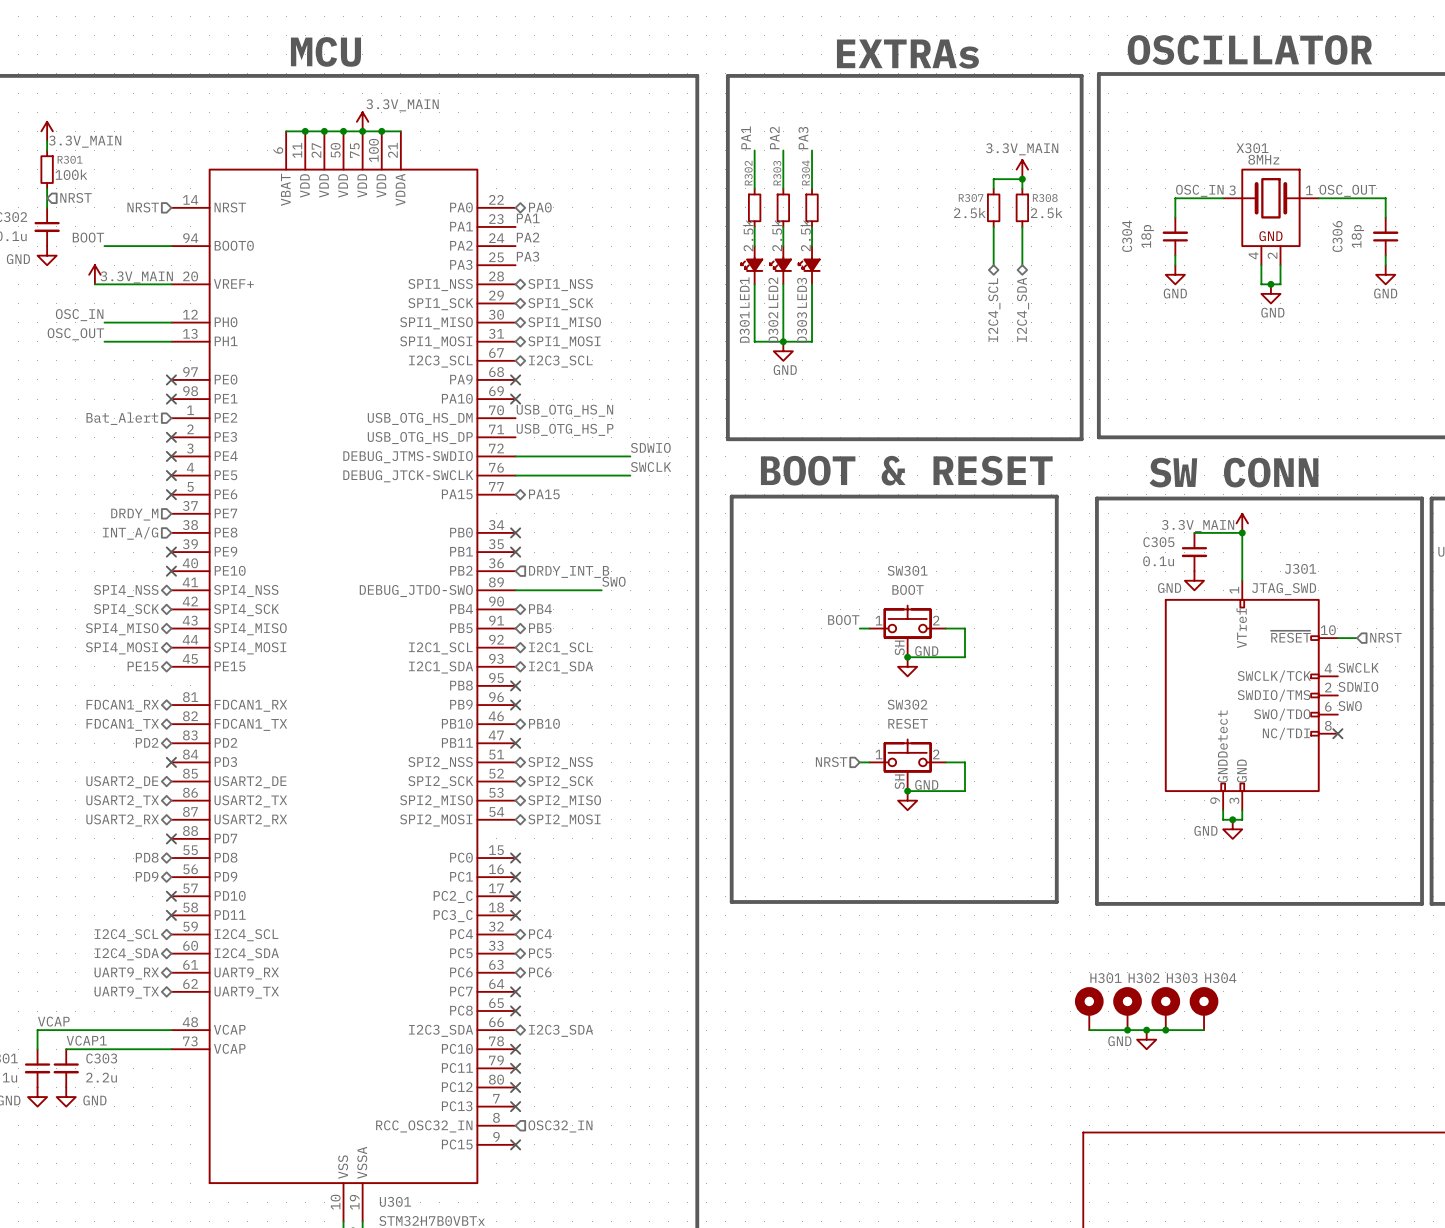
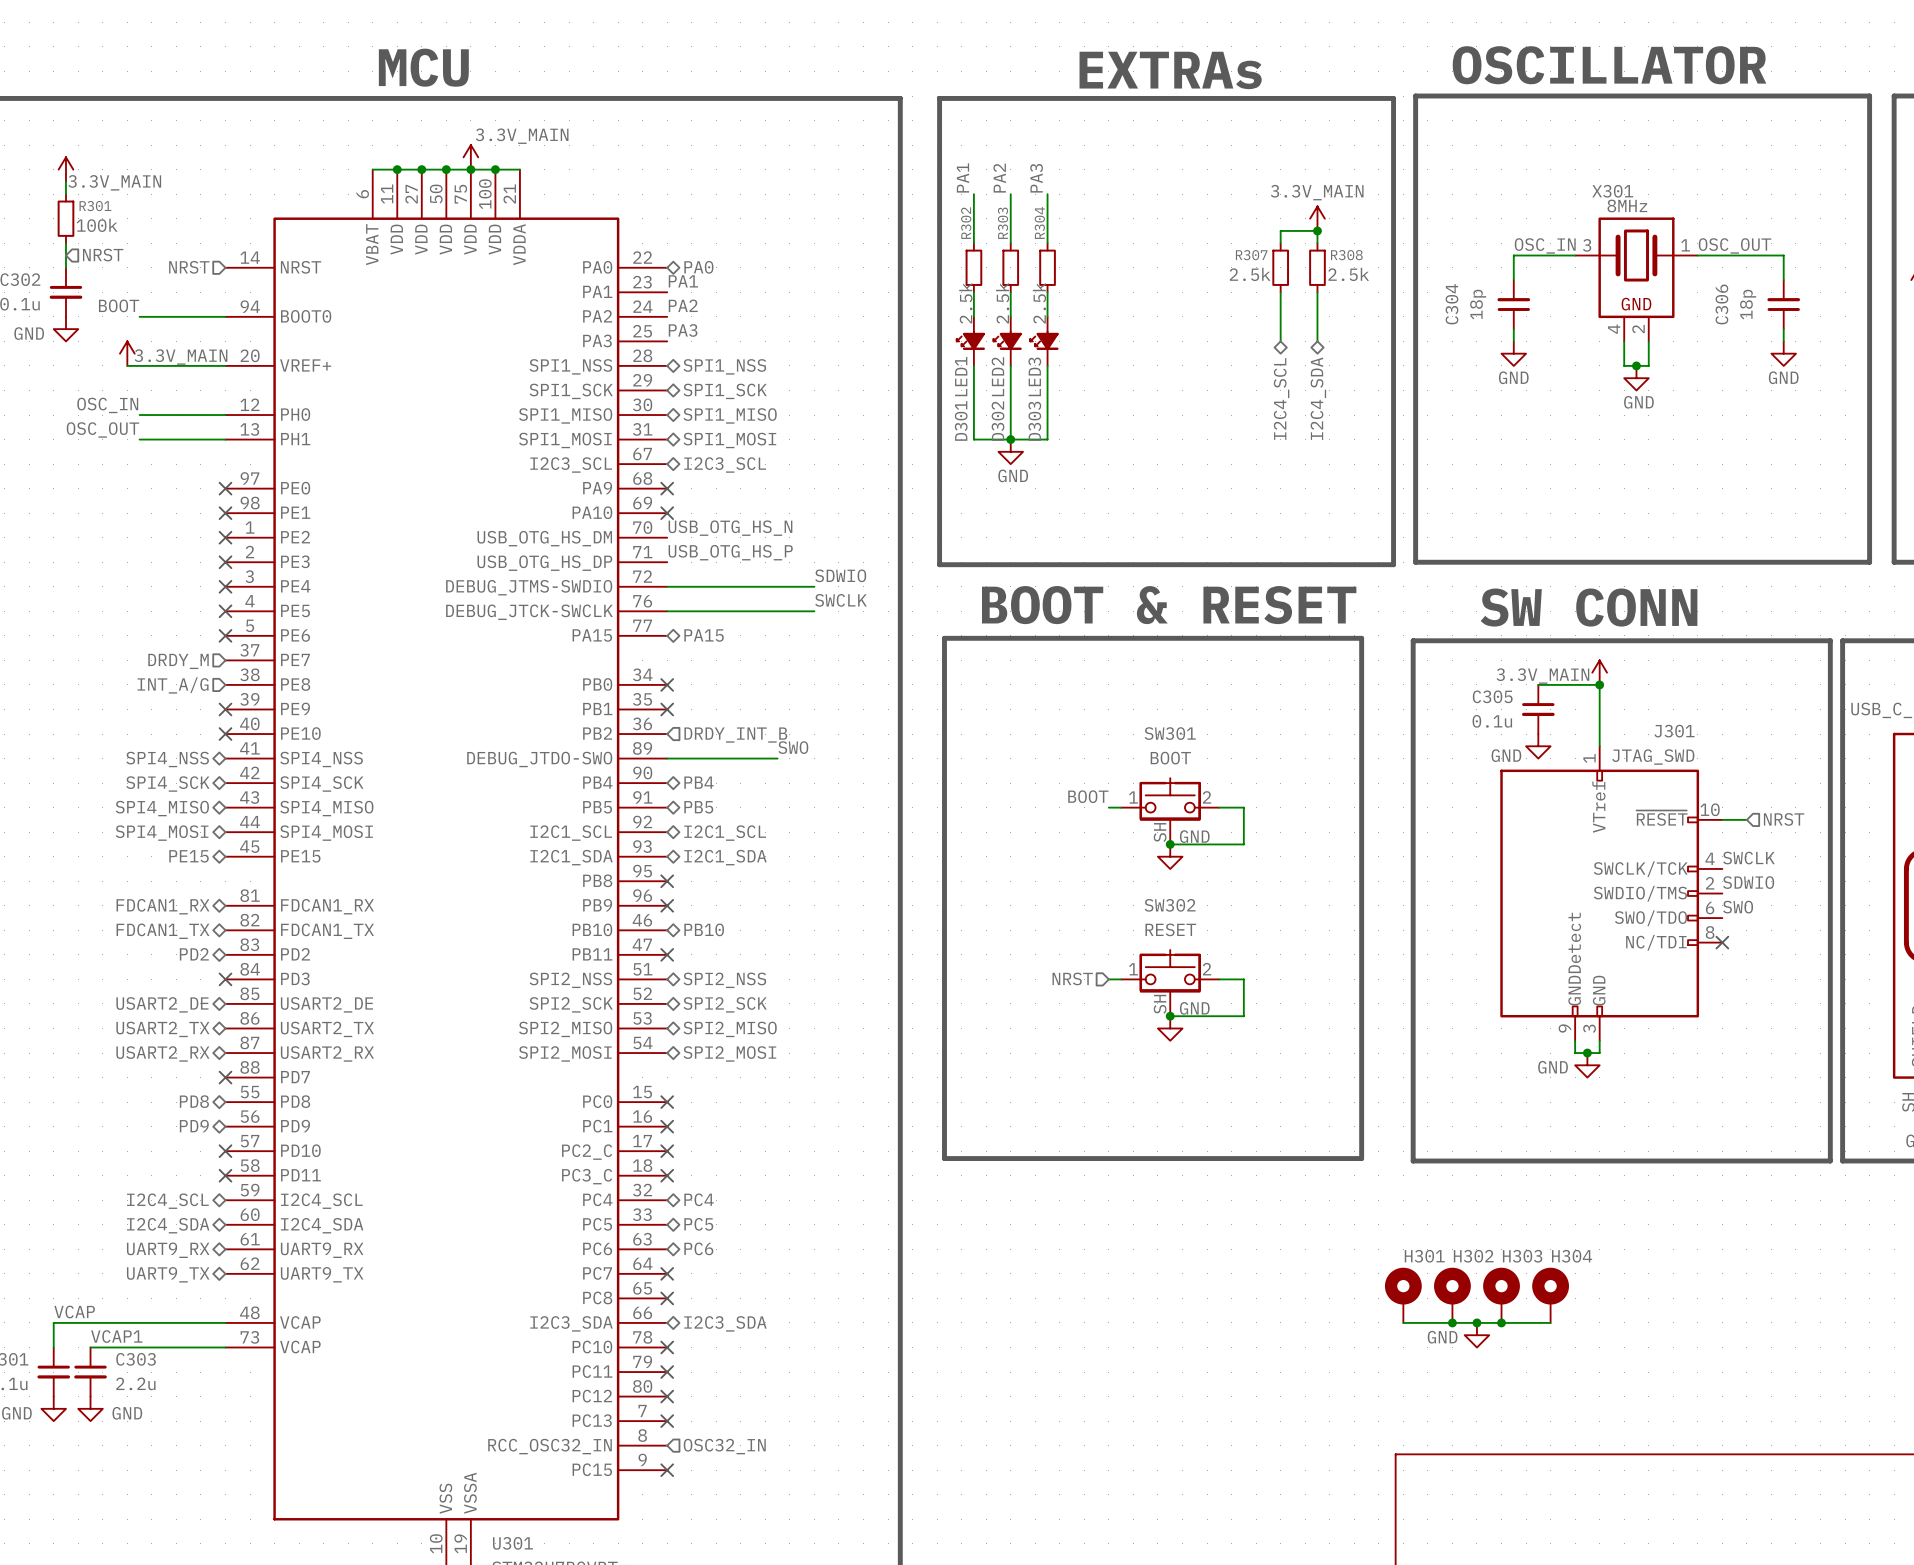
hierarchical label: Bat_Alert (122, 418) -> none
no-connect mark: none -> (225, 537)

